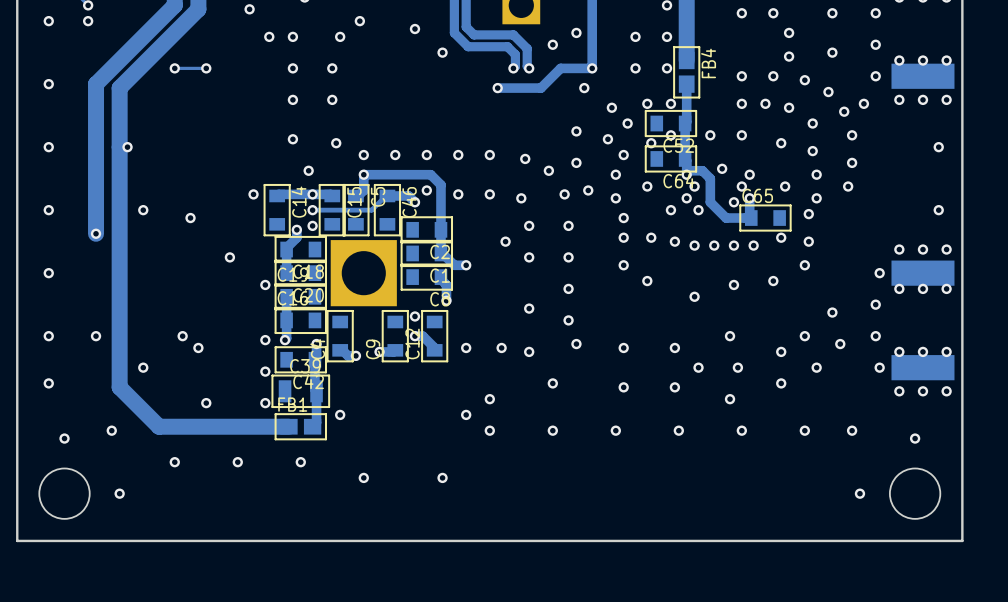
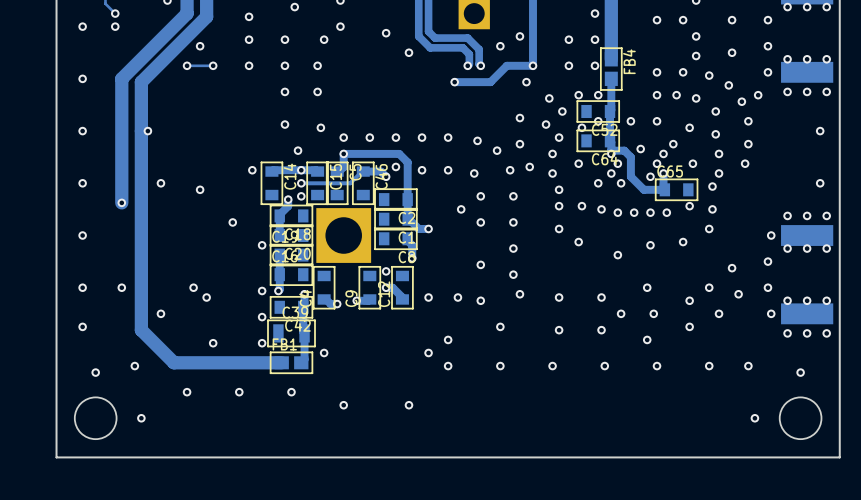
via: none -> (249, 39)
via: (269, 36) -> none
via: none -> (200, 46)
via: none -> (249, 65)
via: none -> (673, 144)

